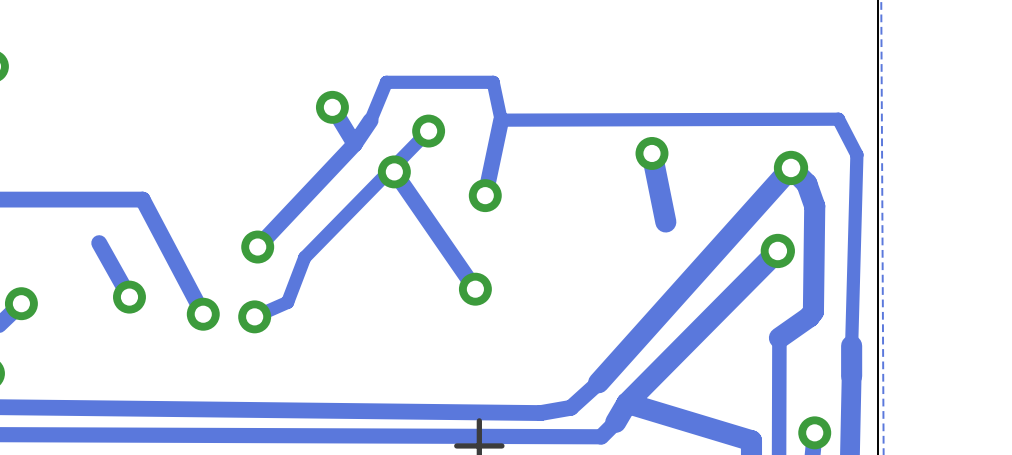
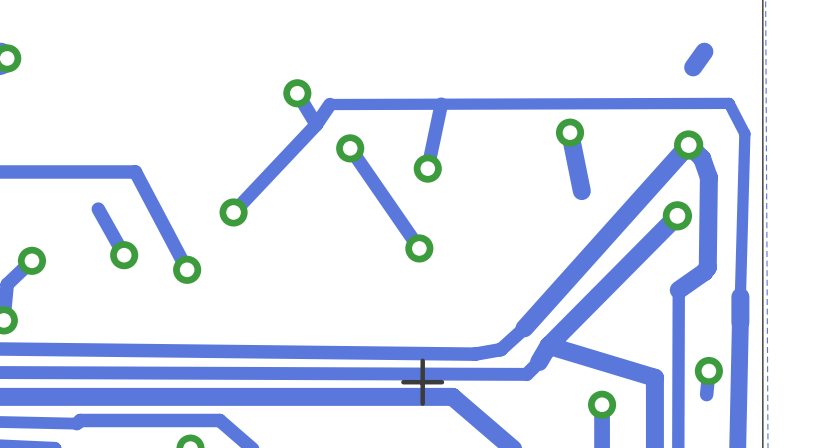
track: none -> (704, 51) (693, 67)
track: (501, 120) (493, 82) (386, 82) (370, 120) -> (441, 104) (329, 104)
track: (428, 131) (304, 257) (287, 302) (254, 316) -> none
via: (428, 131) -> none
via: (254, 316) -> none

